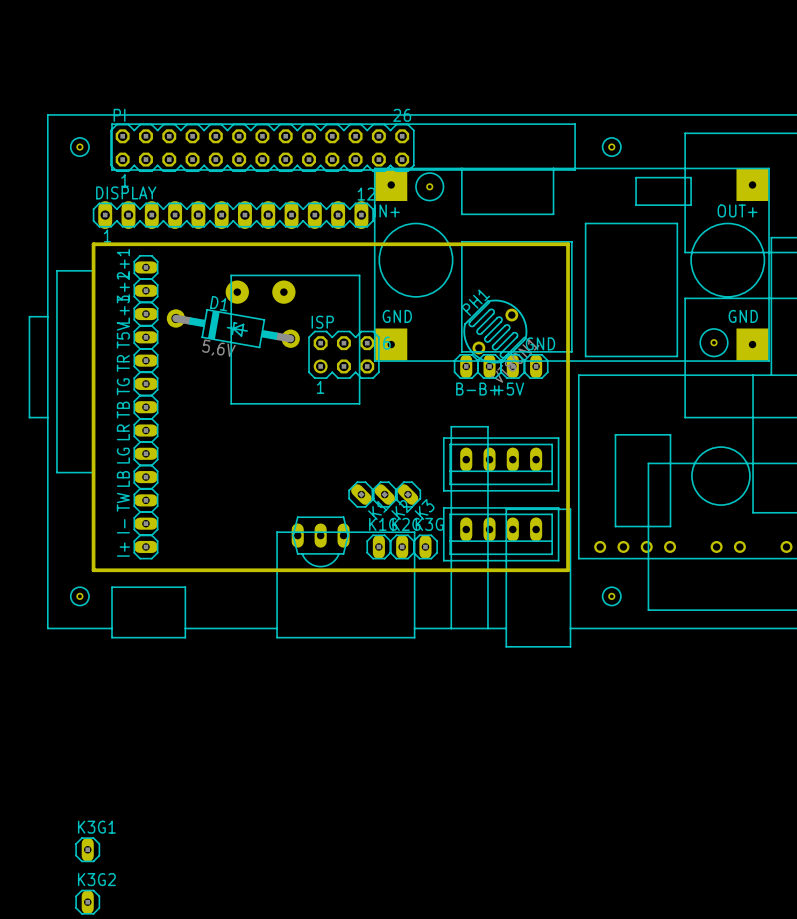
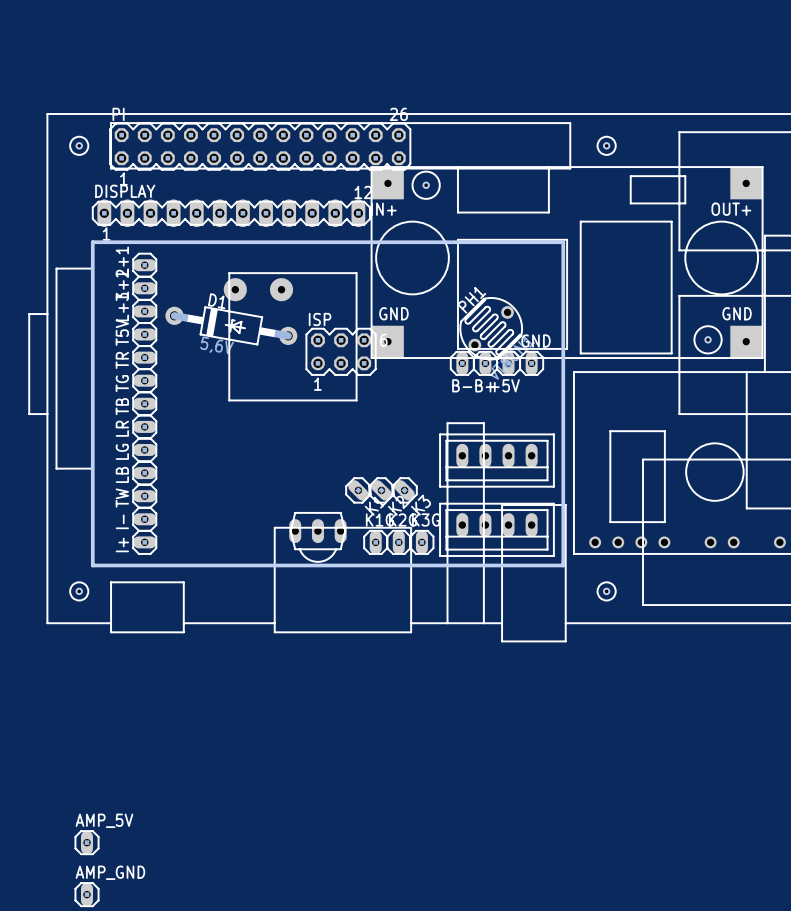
K3G1 name: K3G1 (96, 827) -> AMP_5V (104, 820)
K3G2 name: K3G2 (96, 879) -> AMP_GND (110, 872)

